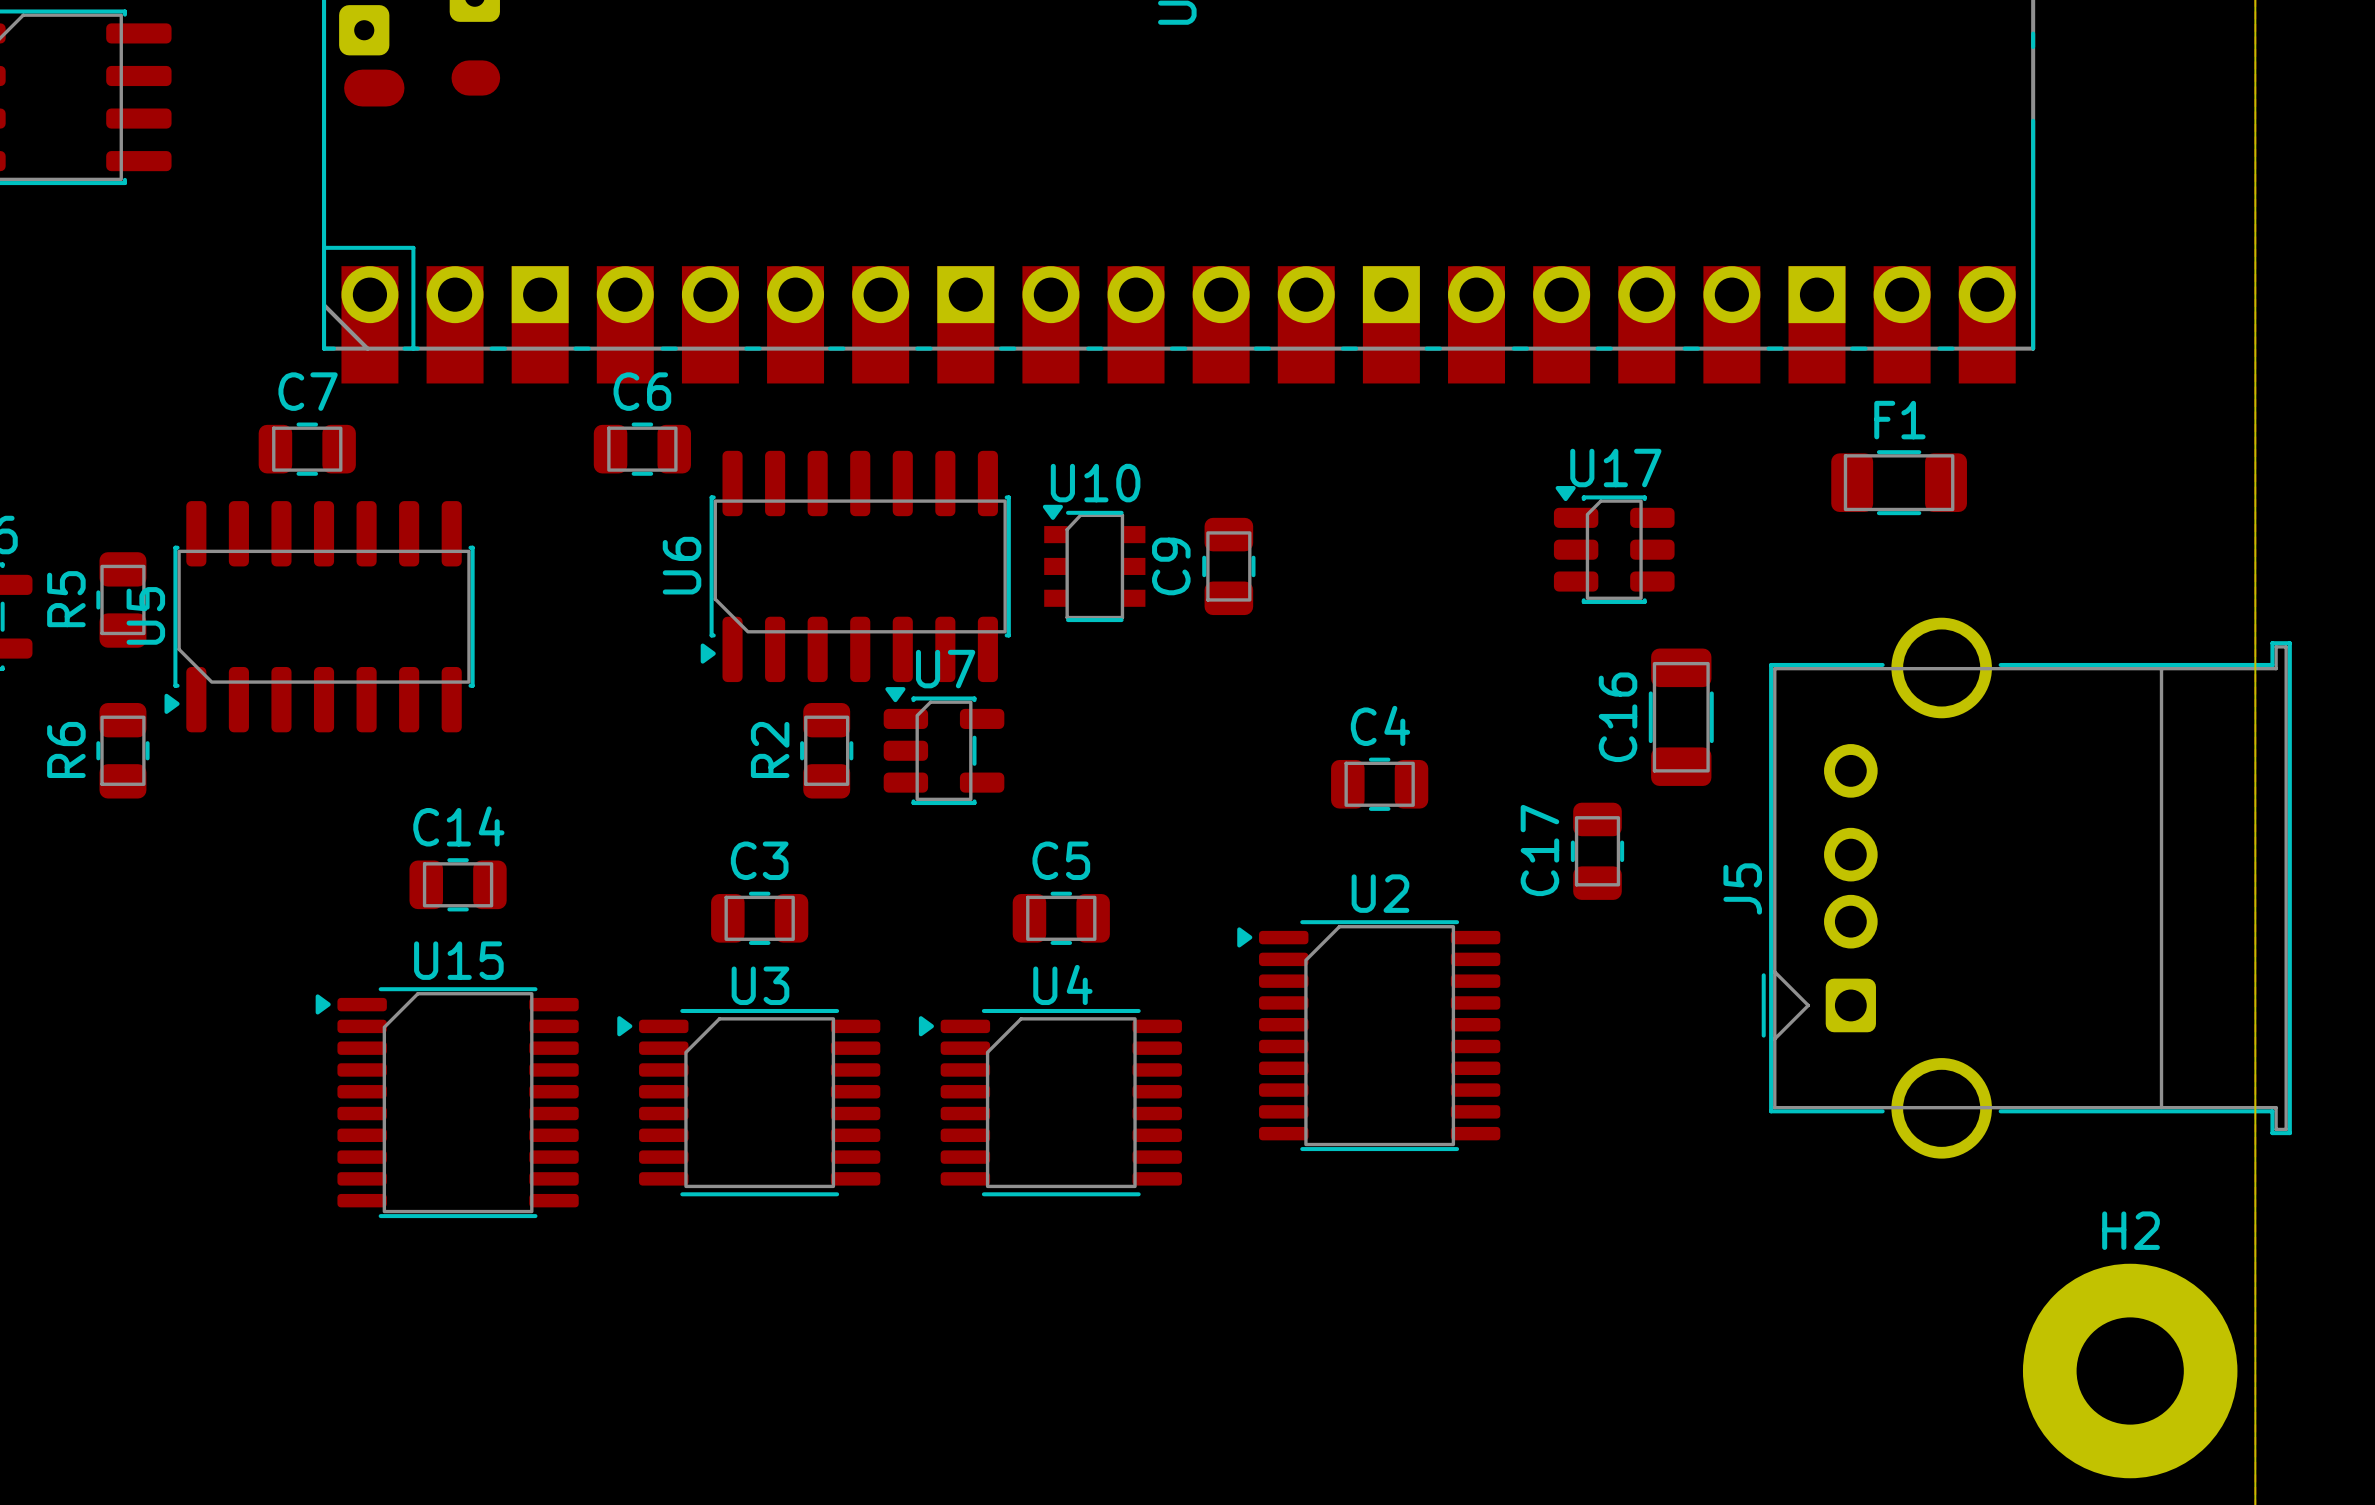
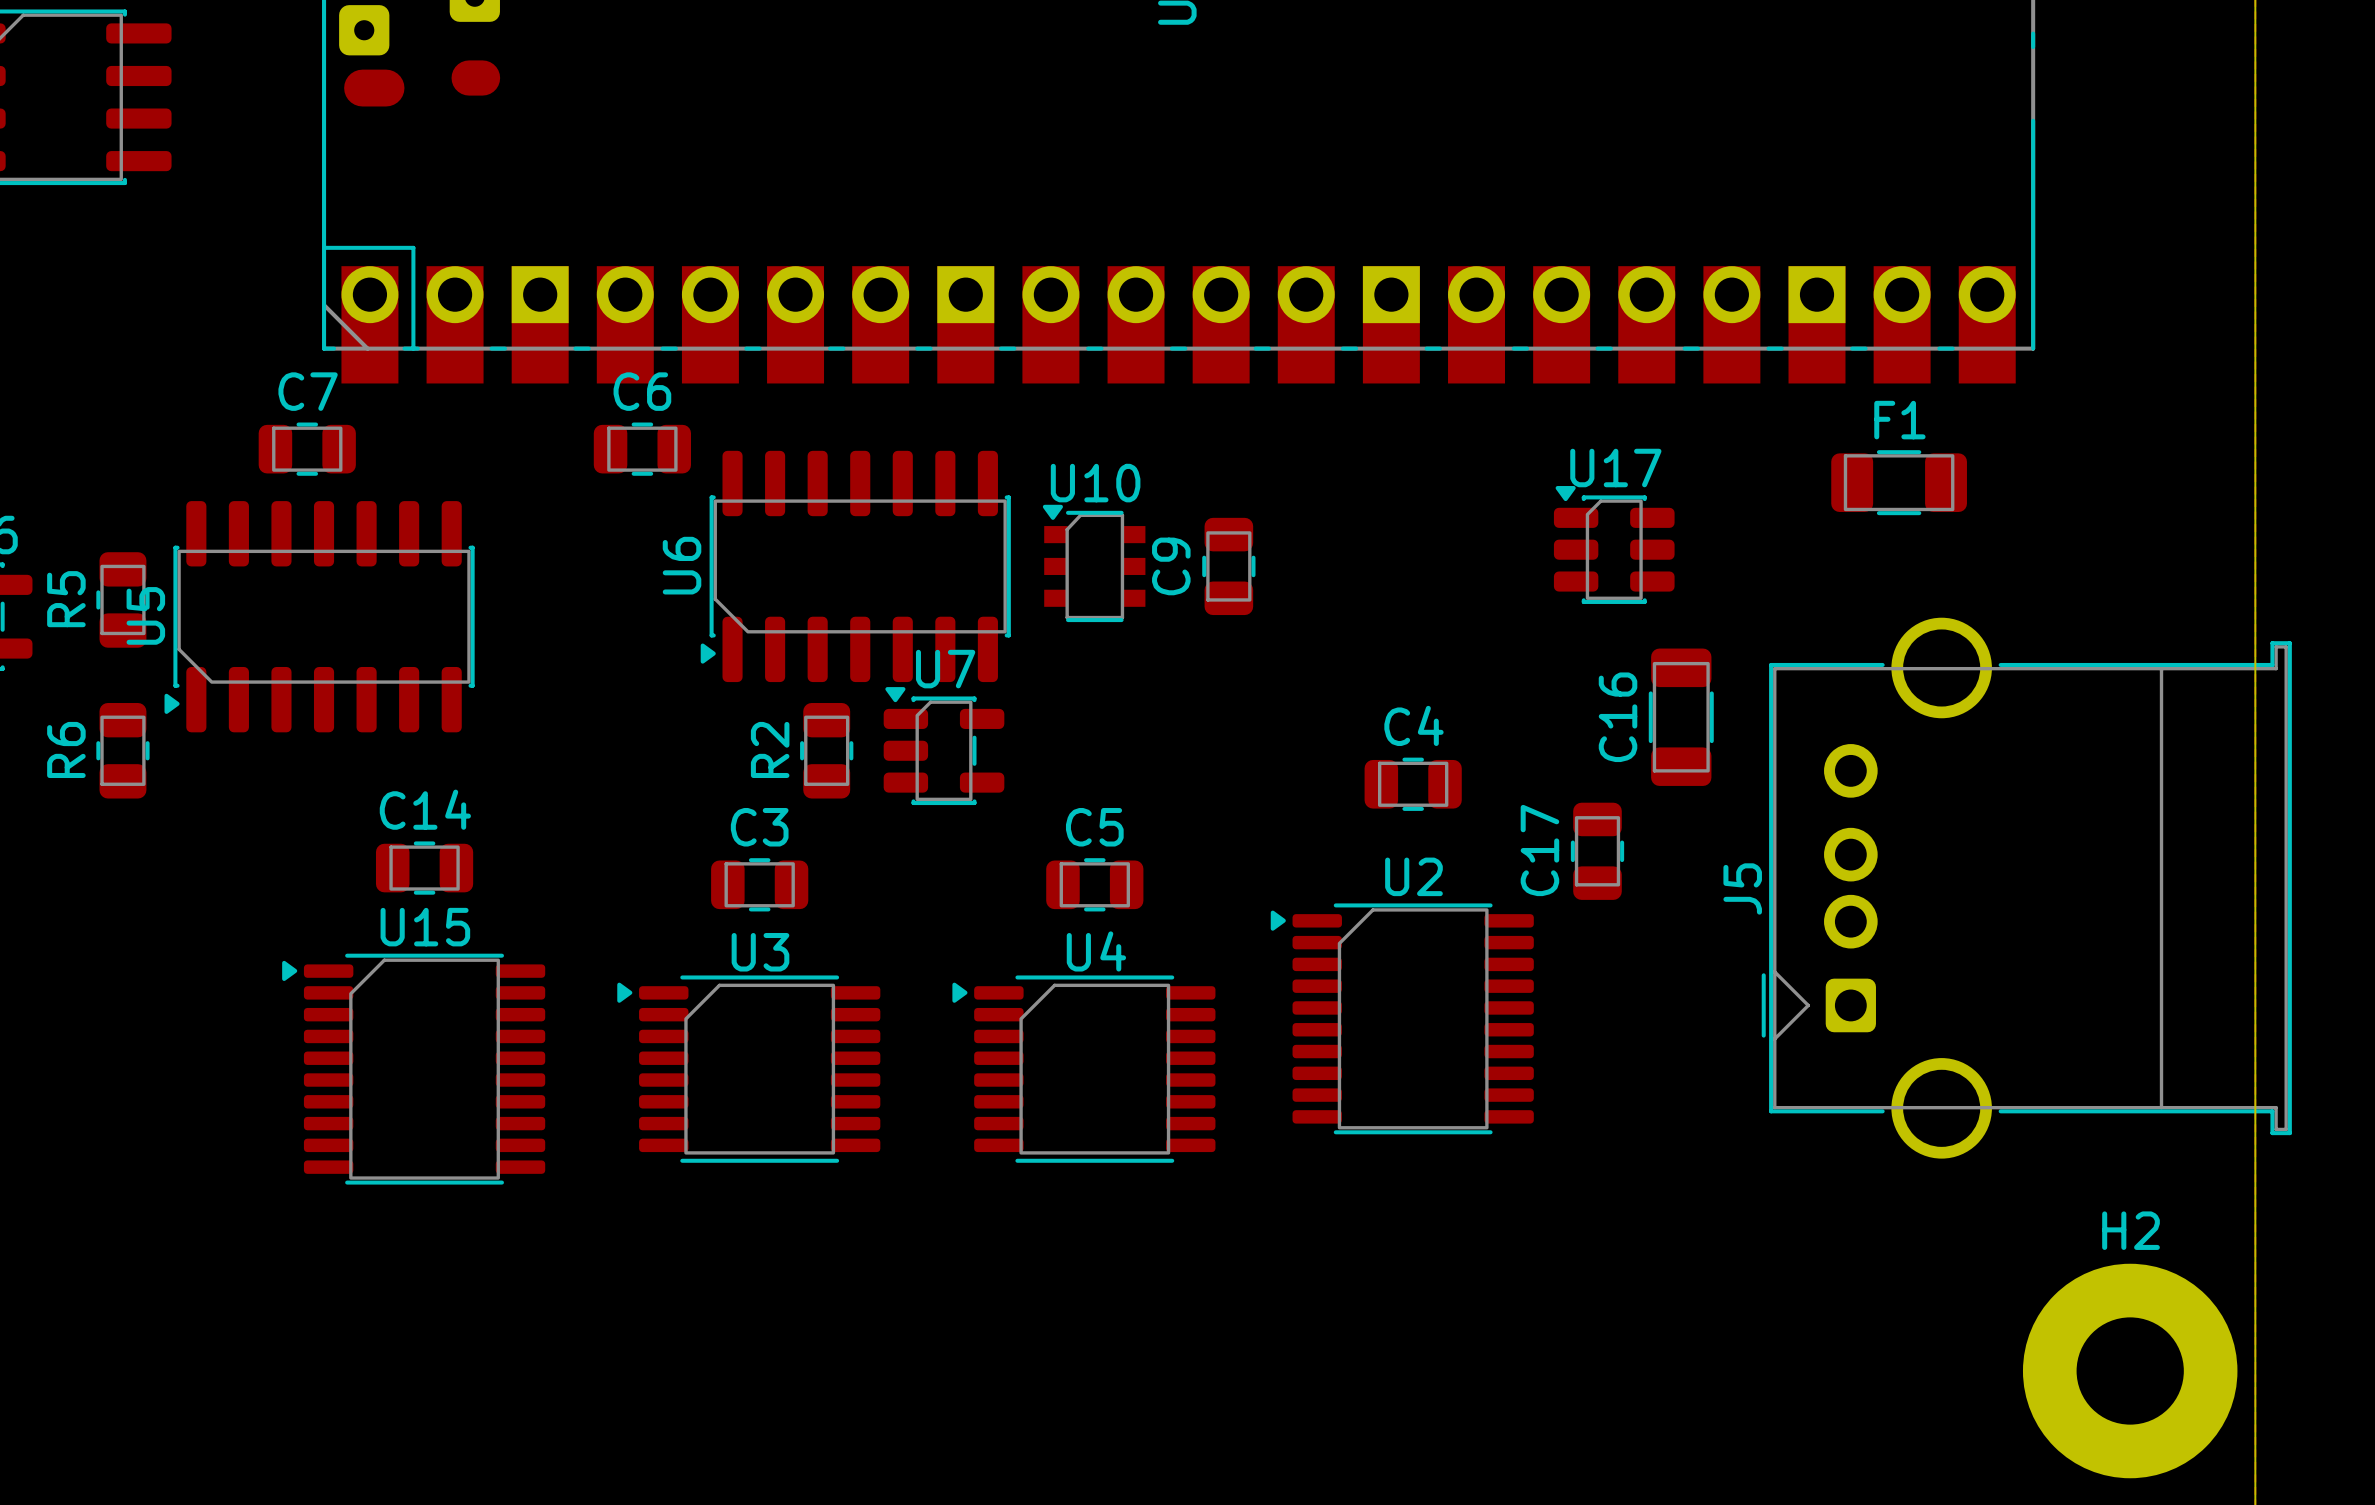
C4 position: (1379, 784) -> (1413, 784)
C14 position: (458, 884) -> (424, 868)
C3 position: (759, 918) -> (759, 884)
C5 position: (1061, 918) -> (1094, 884)
U2 position: (1368, 1035) -> (1402, 1018)
U15 position: (447, 1102) -> (413, 1069)
U3 position: (748, 1102) -> (748, 1069)
U4 position: (1050, 1102) -> (1083, 1069)

